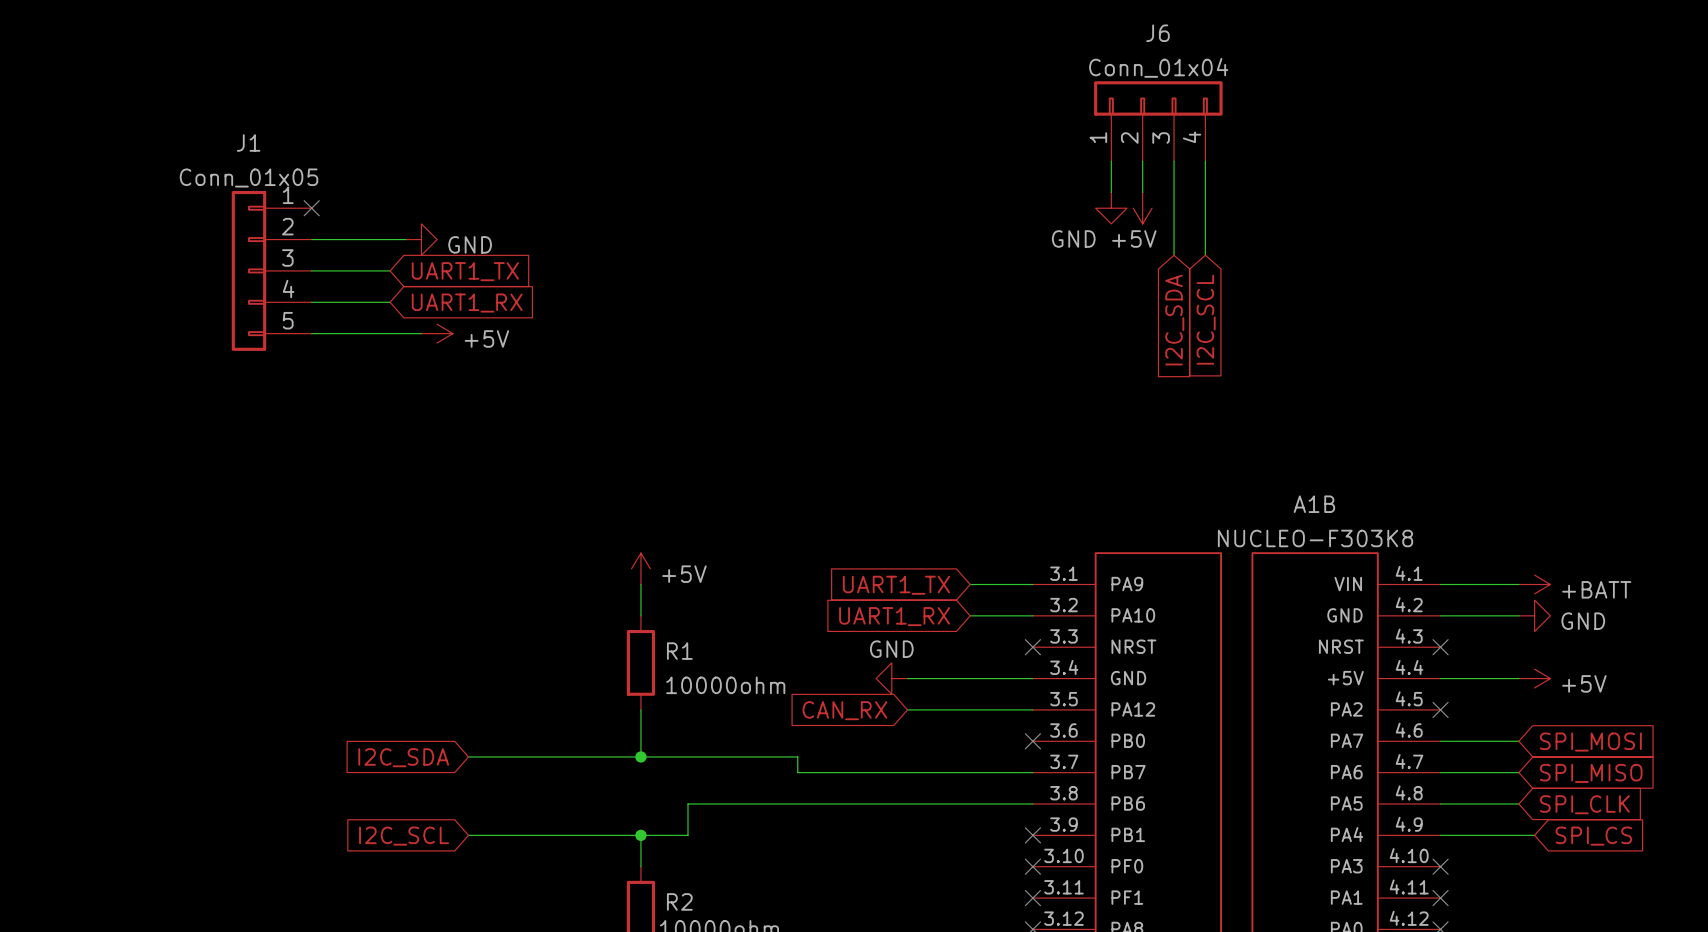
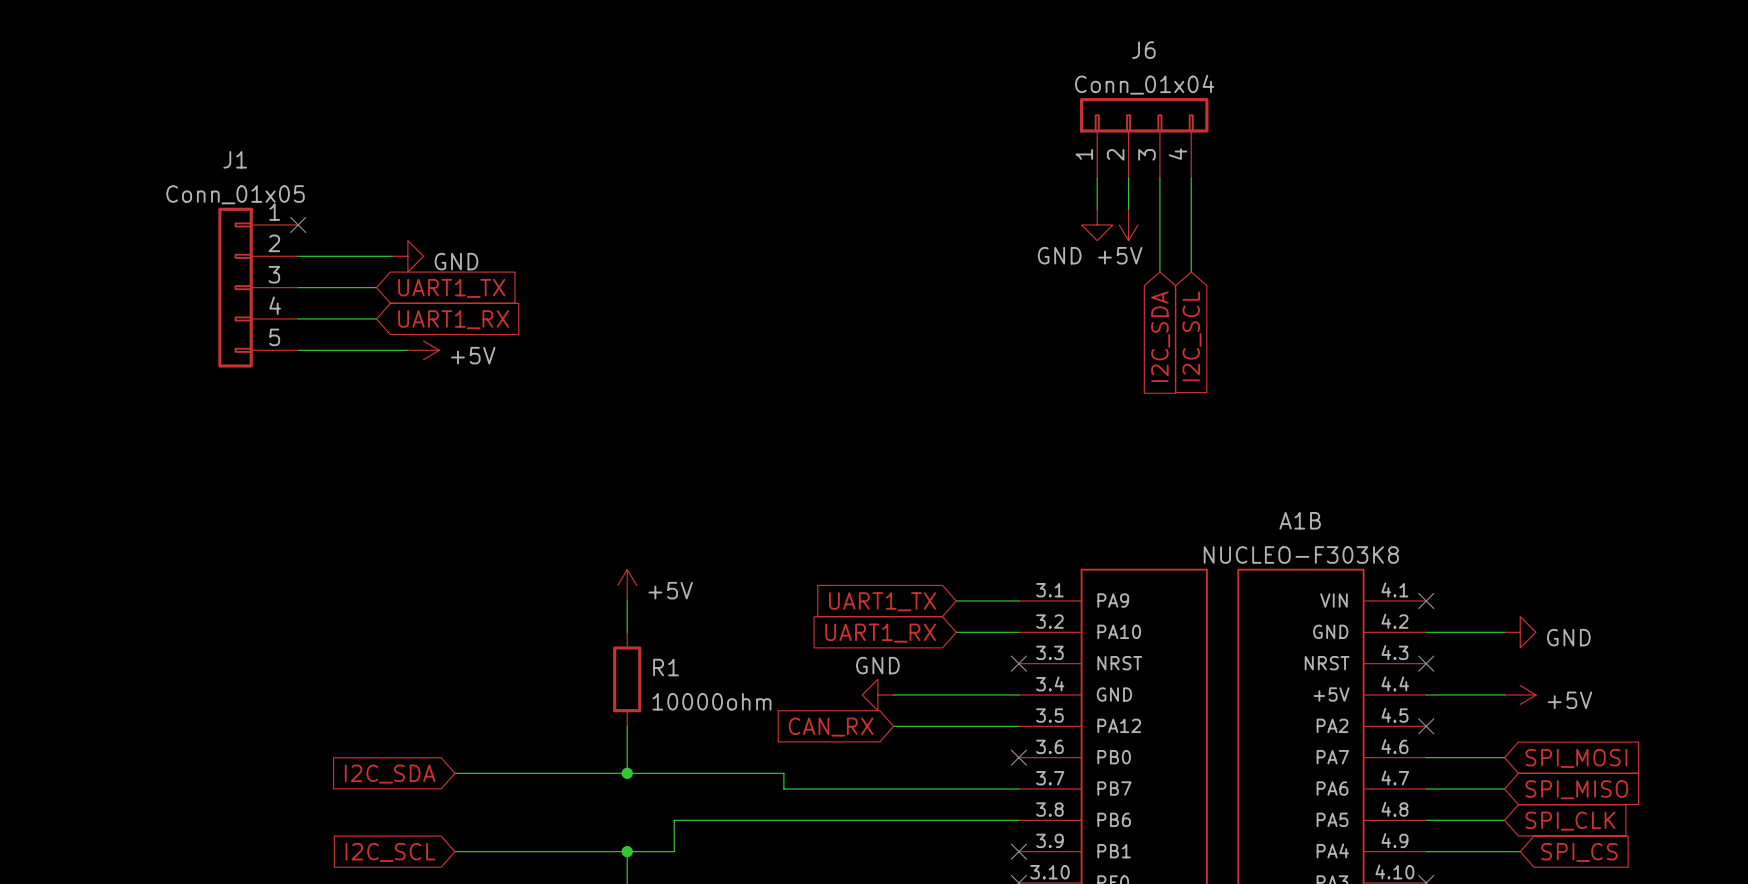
wire: (1440, 584) (1518, 584) -> none
no-connect mark: none -> (1426, 600)
power symbol: +BATT (1534, 584) -> none

